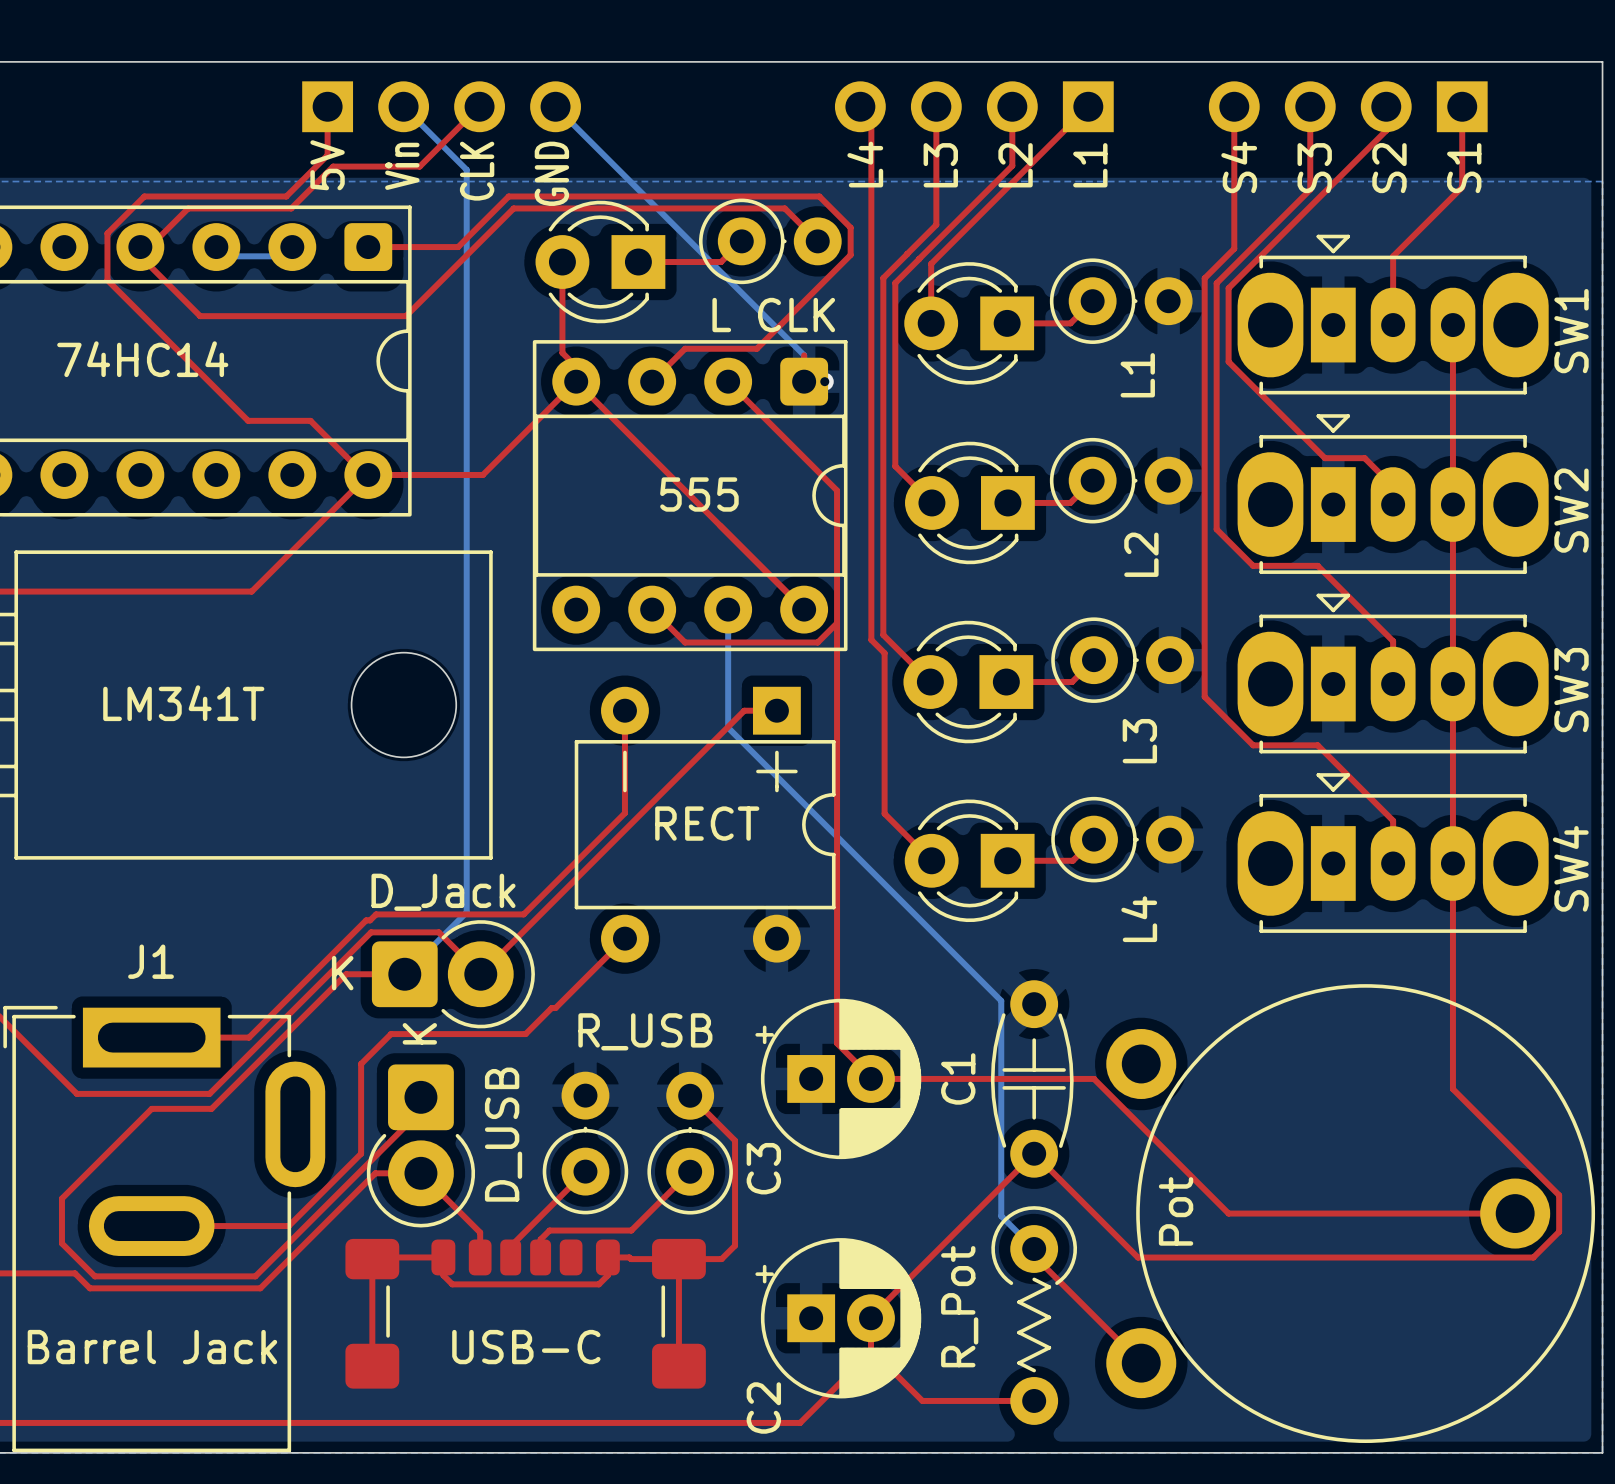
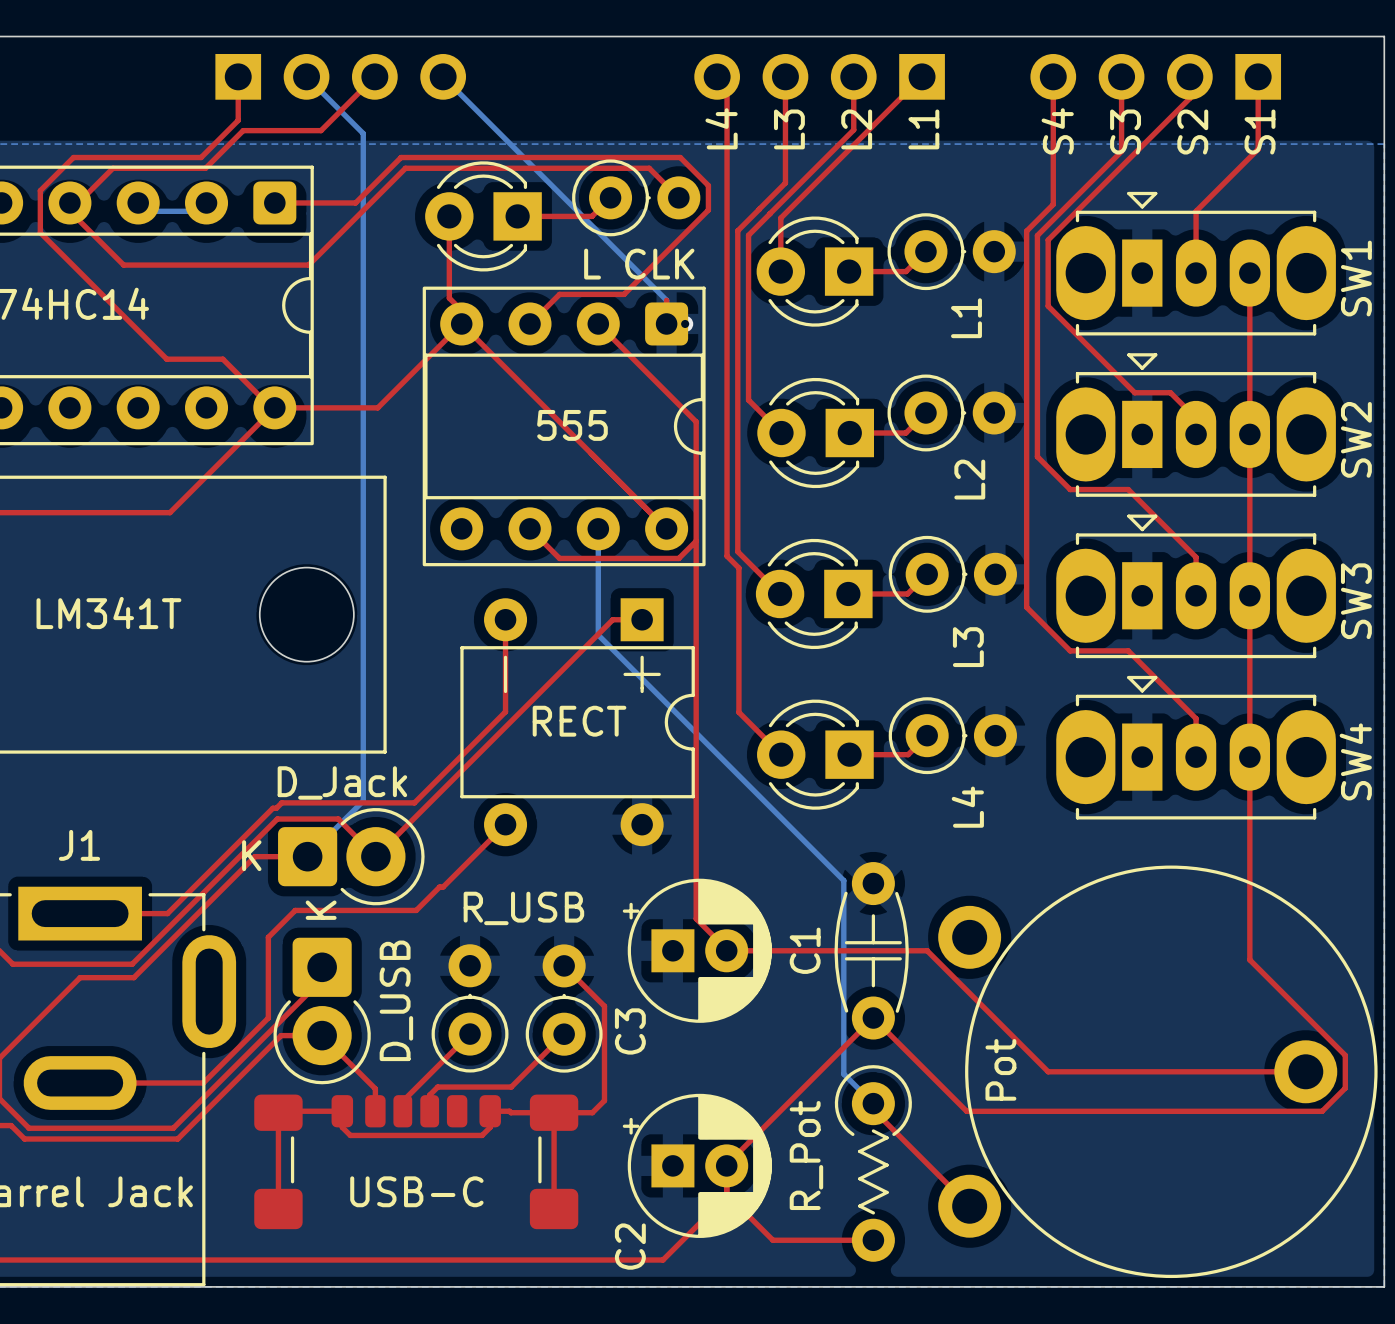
text: 5V (327, 165) -> none
text: Vin (402, 166) -> none
text: CLK (477, 171) -> none
text: GND (551, 173) -> none

